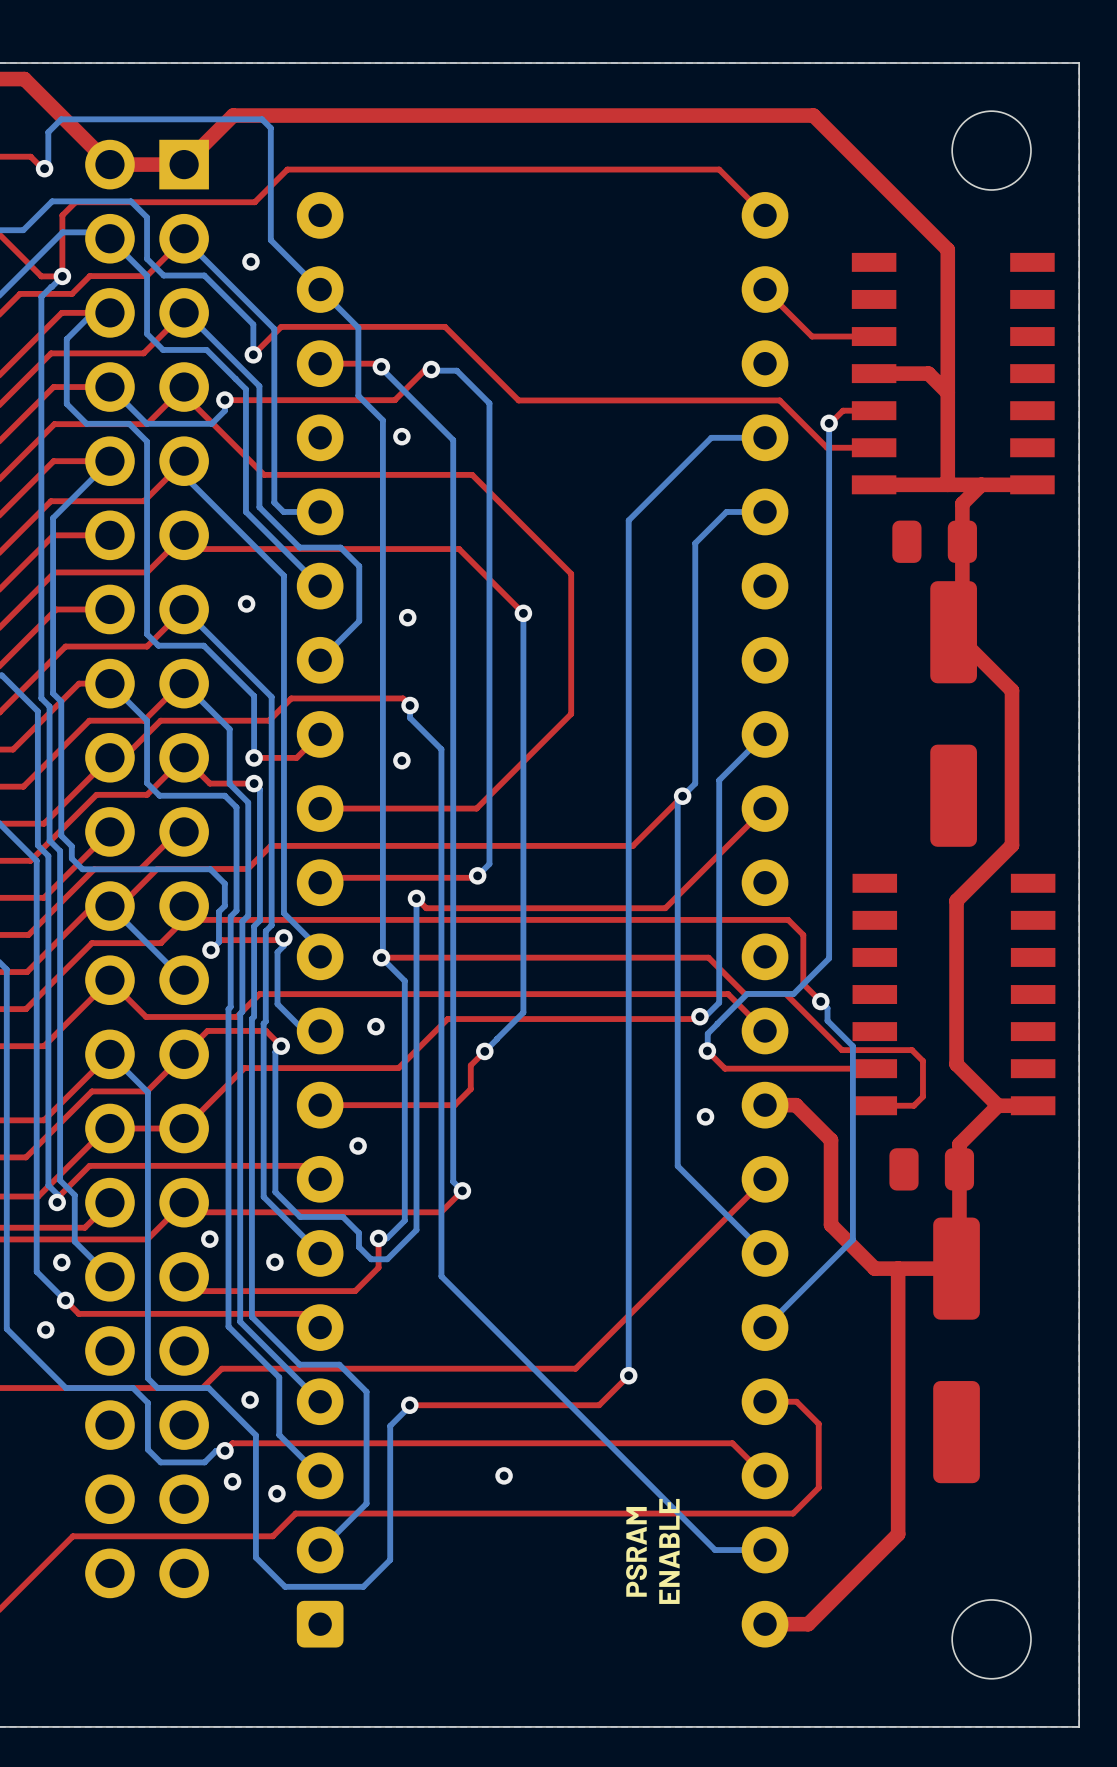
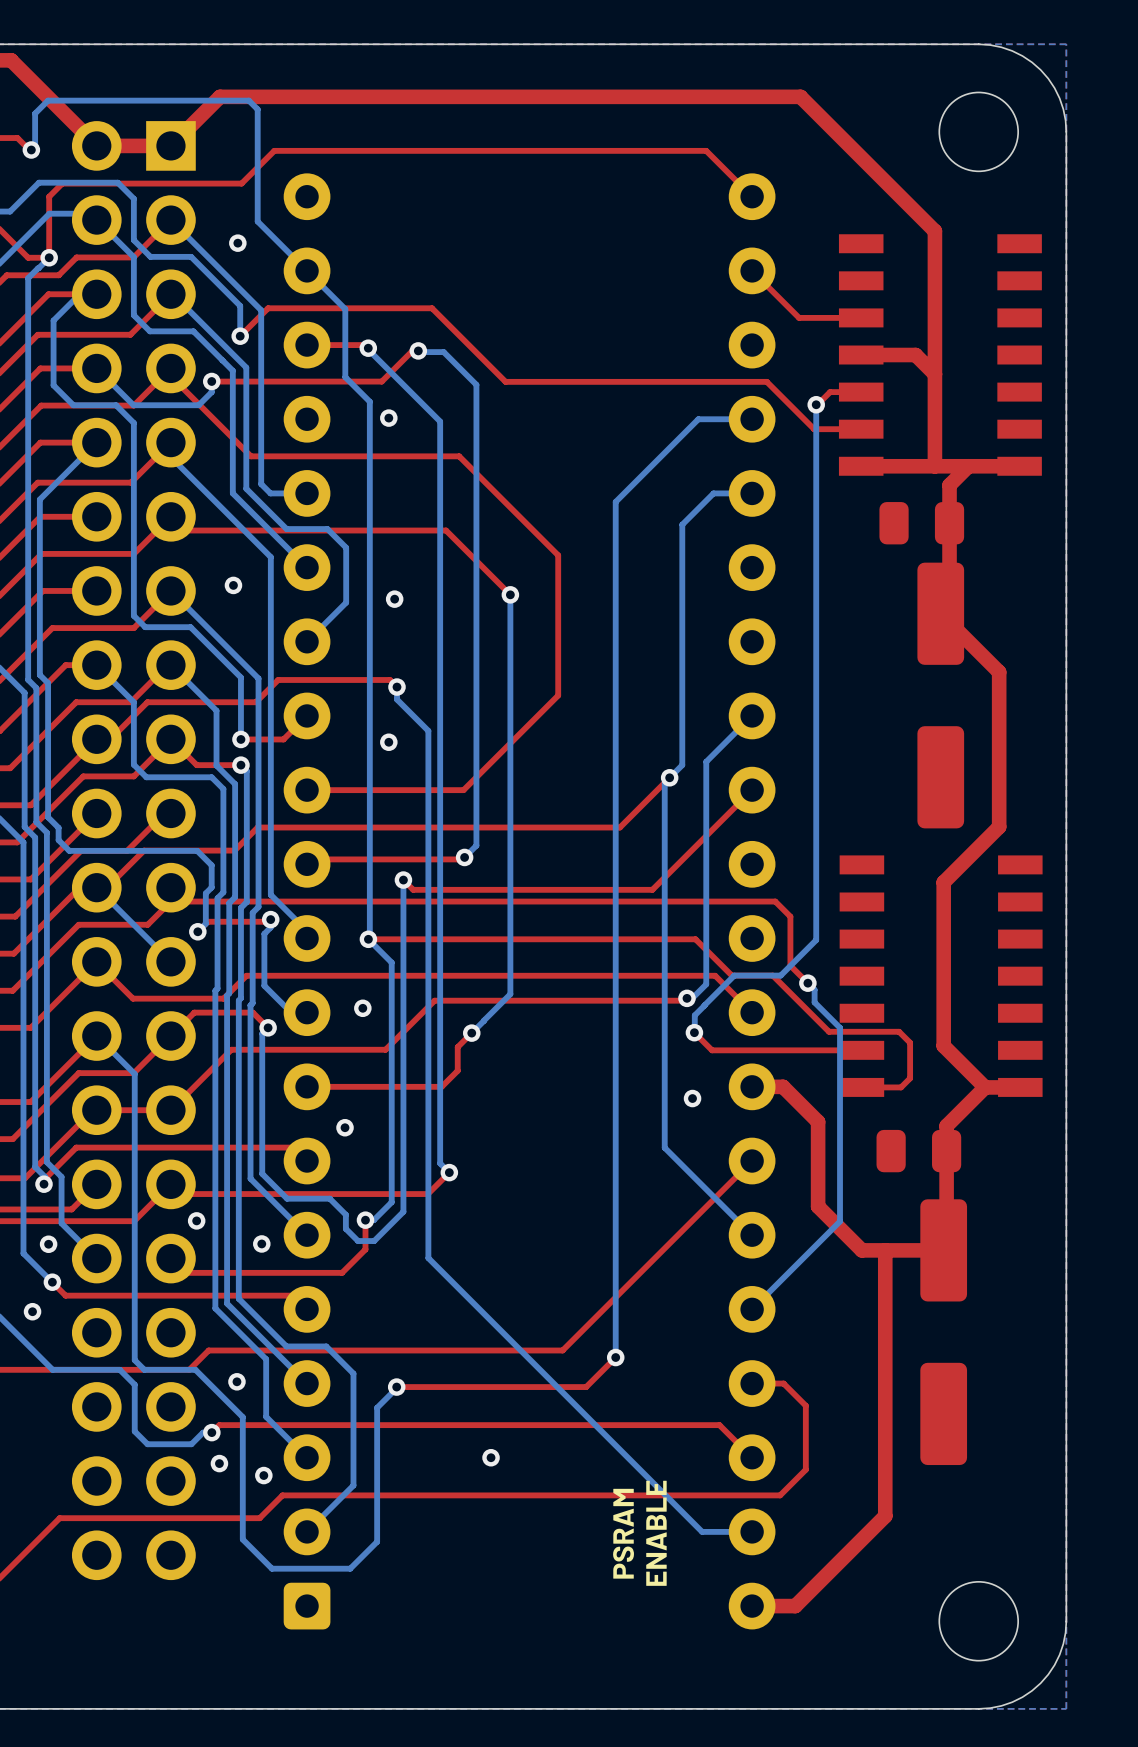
board edge: (991, 63) (1079, 63) (1079, 150) -> (978, 44) (1012, 50) (1040, 69) (1059, 98) (1066, 131)
board edge: (1079, 1639) (1079, 1726) (991, 1726) -> (1066, 1621) (1059, 1654) (1040, 1683) (1012, 1702) (978, 1708)

